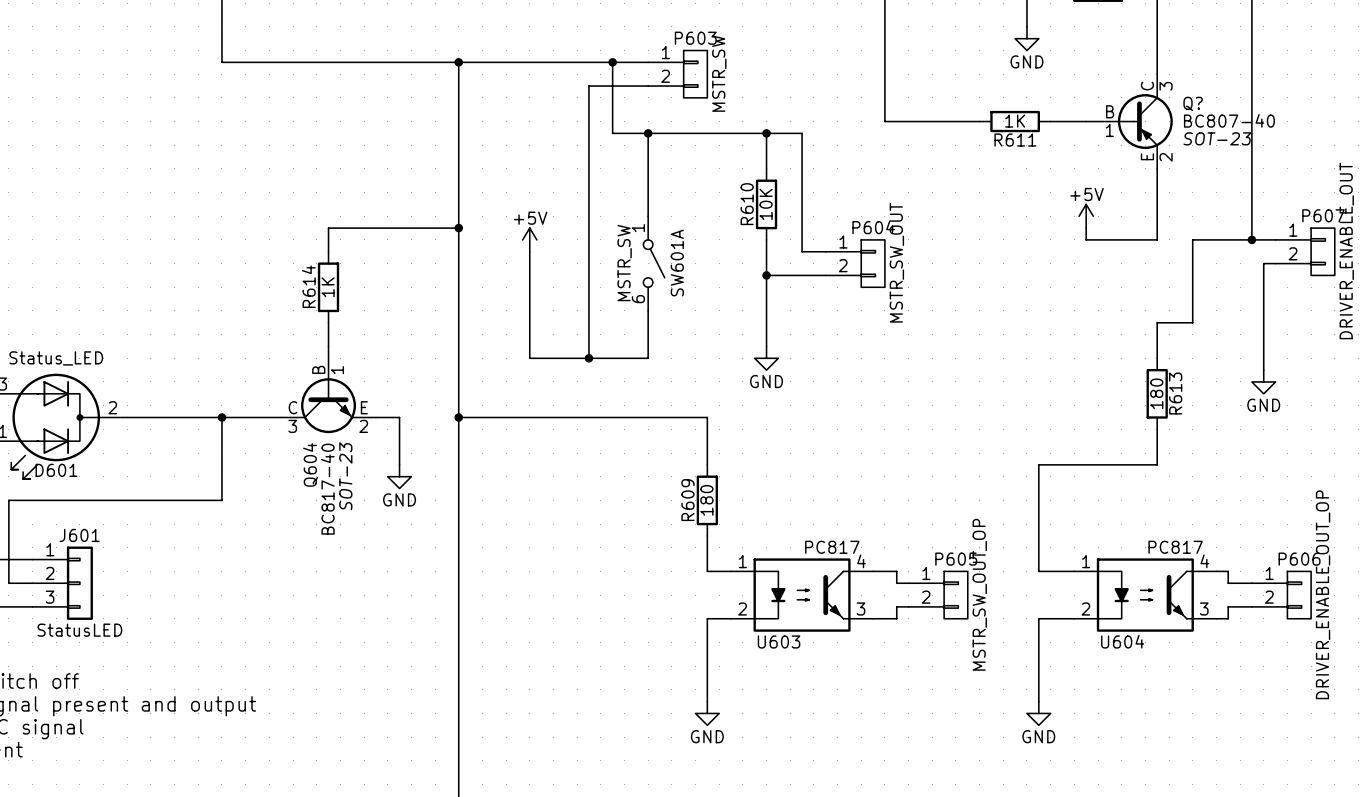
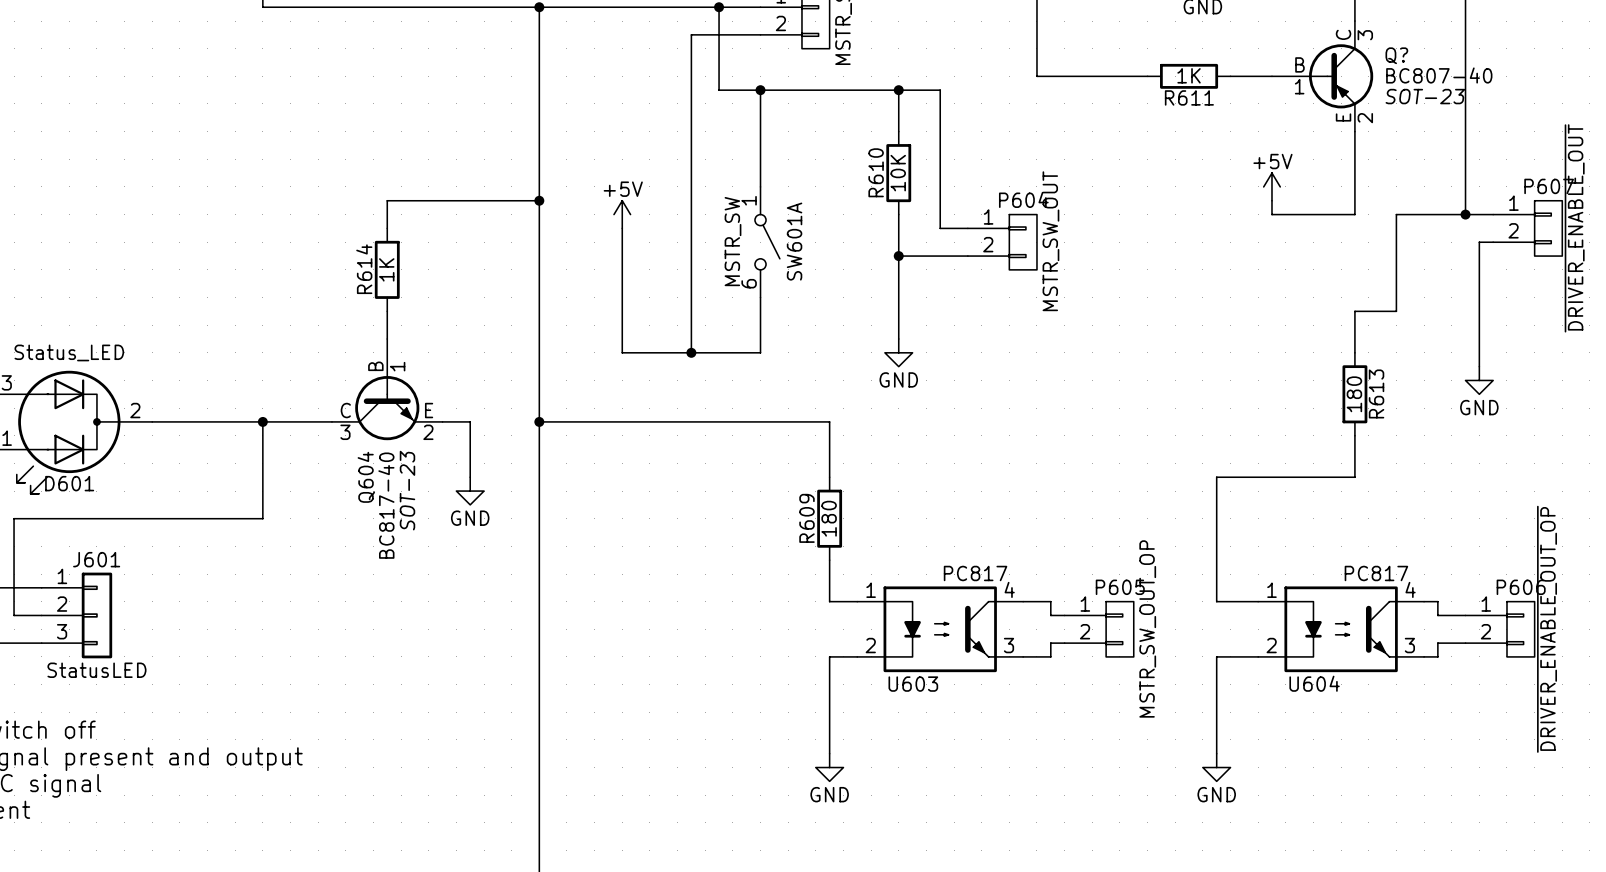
P607 value: DRIVER_ENABLE_OUT (1346, 250) -> ~{DRIVER_ENABLE_OUT} (1574, 228)
P606 value: DRIVER_ENABLE_OUT_OP (1323, 594) -> ~{DRIVER_ENABLE_OUT_OP} (1547, 629)

